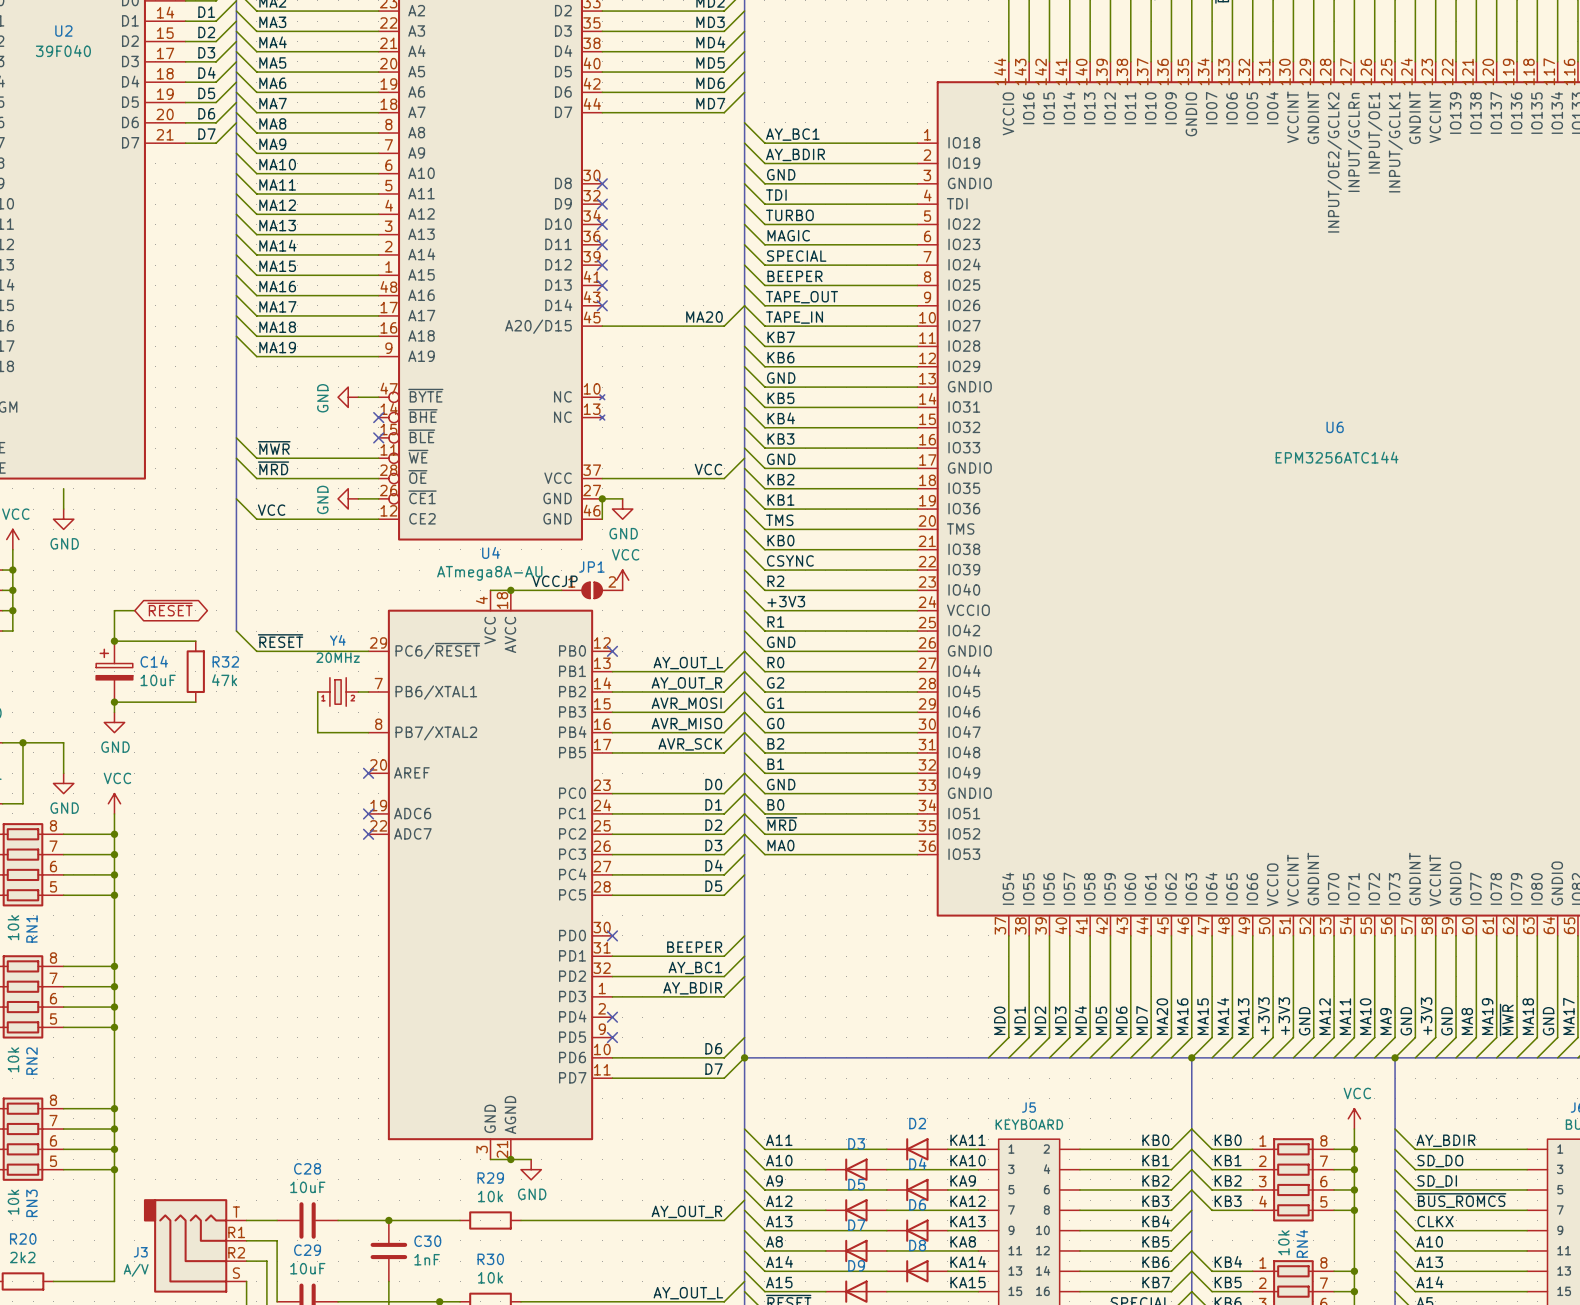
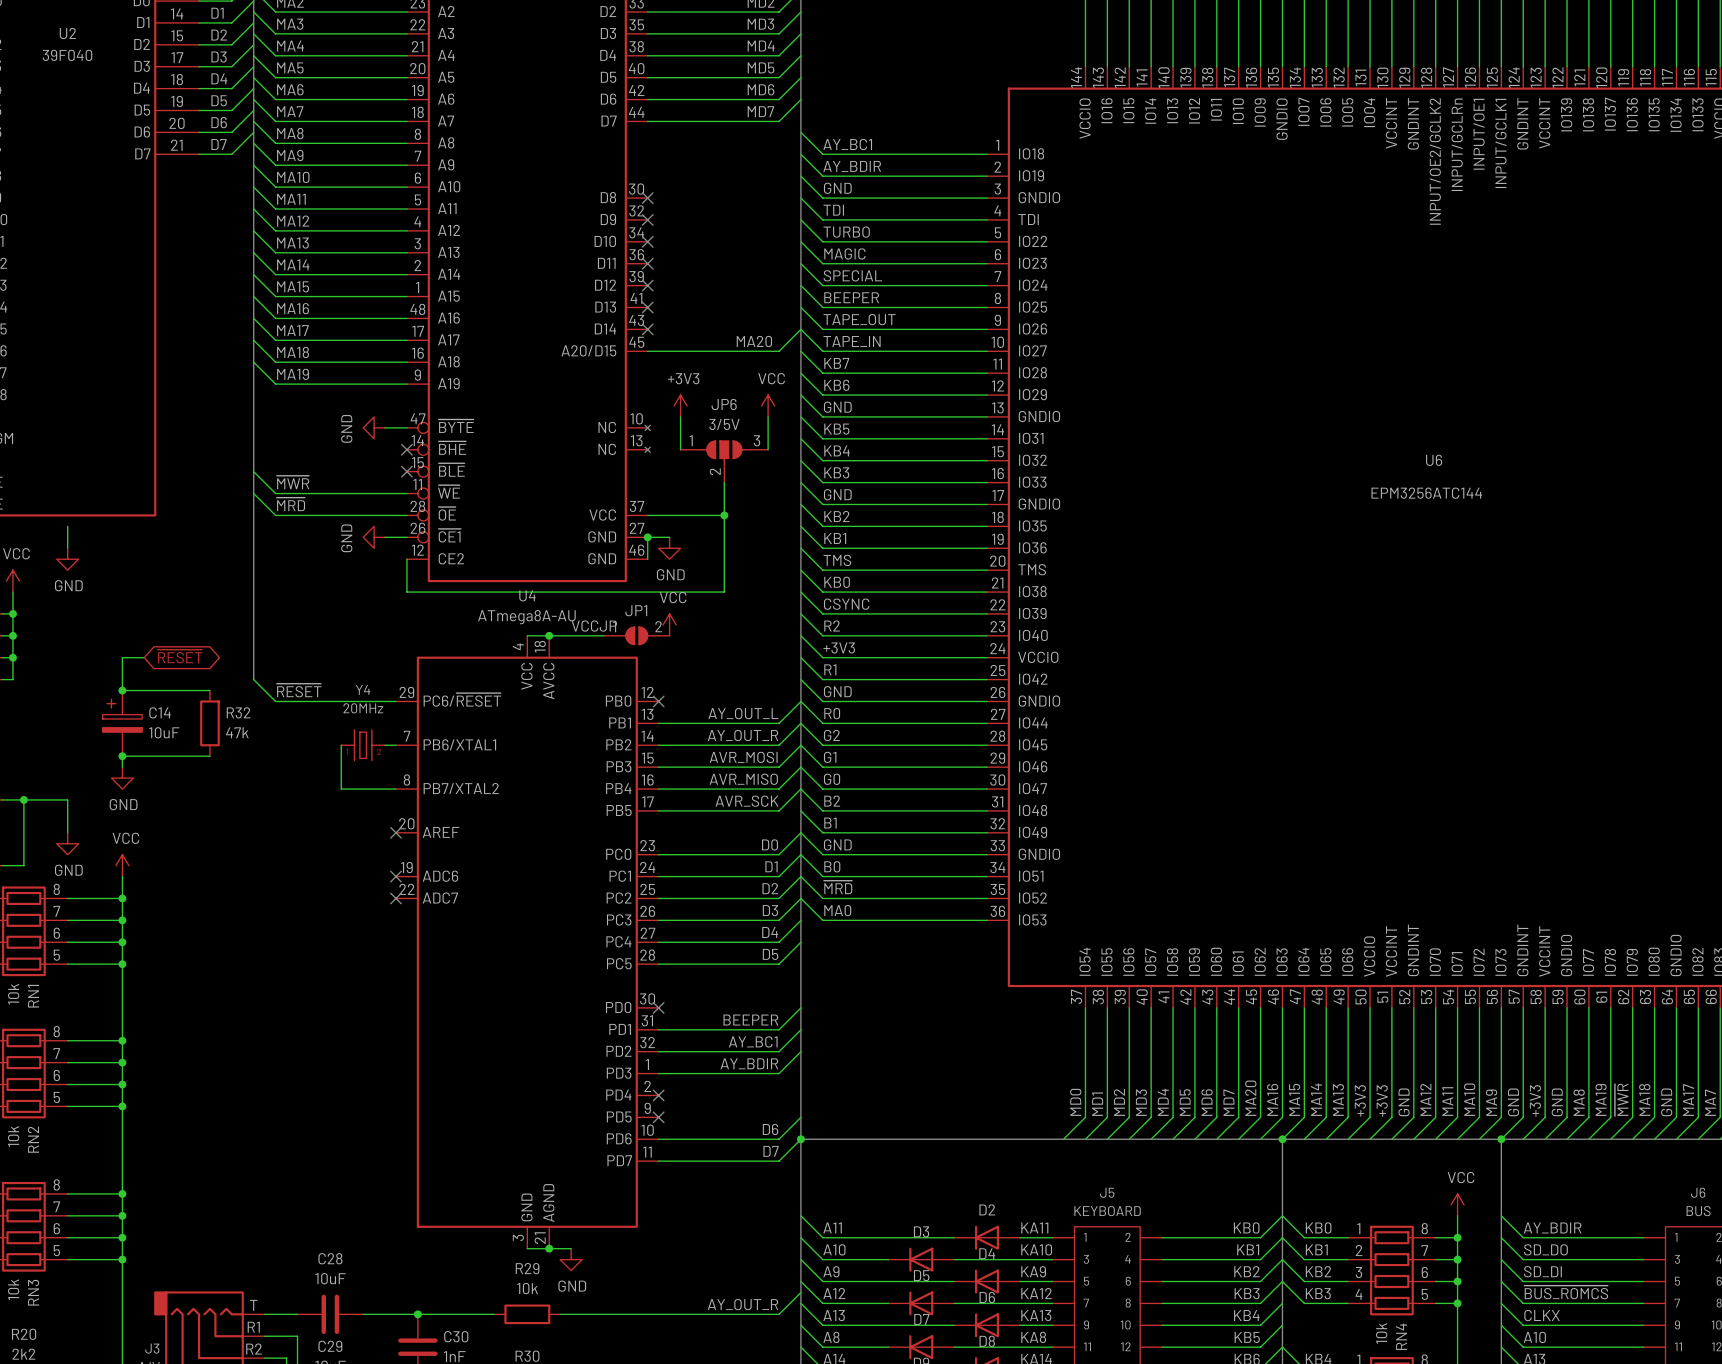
power symbol: none -> +3V3 (680, 405)
power symbol: none -> VCC (768, 405)
wire: none -> (680, 416) (680, 449)
wire: none -> (768, 416) (768, 449)
JP6: none -> 3/5V (724, 461)
wire: (744, 458) (724, 478) (673, 478) -> none
label: VCC (708, 469) -> none
junction: none -> (724, 515)
wire: (236, 498) (256, 519) (378, 519) -> (724, 482) (724, 592) (406, 592) (406, 559)
label: VCC (271, 510) -> none

